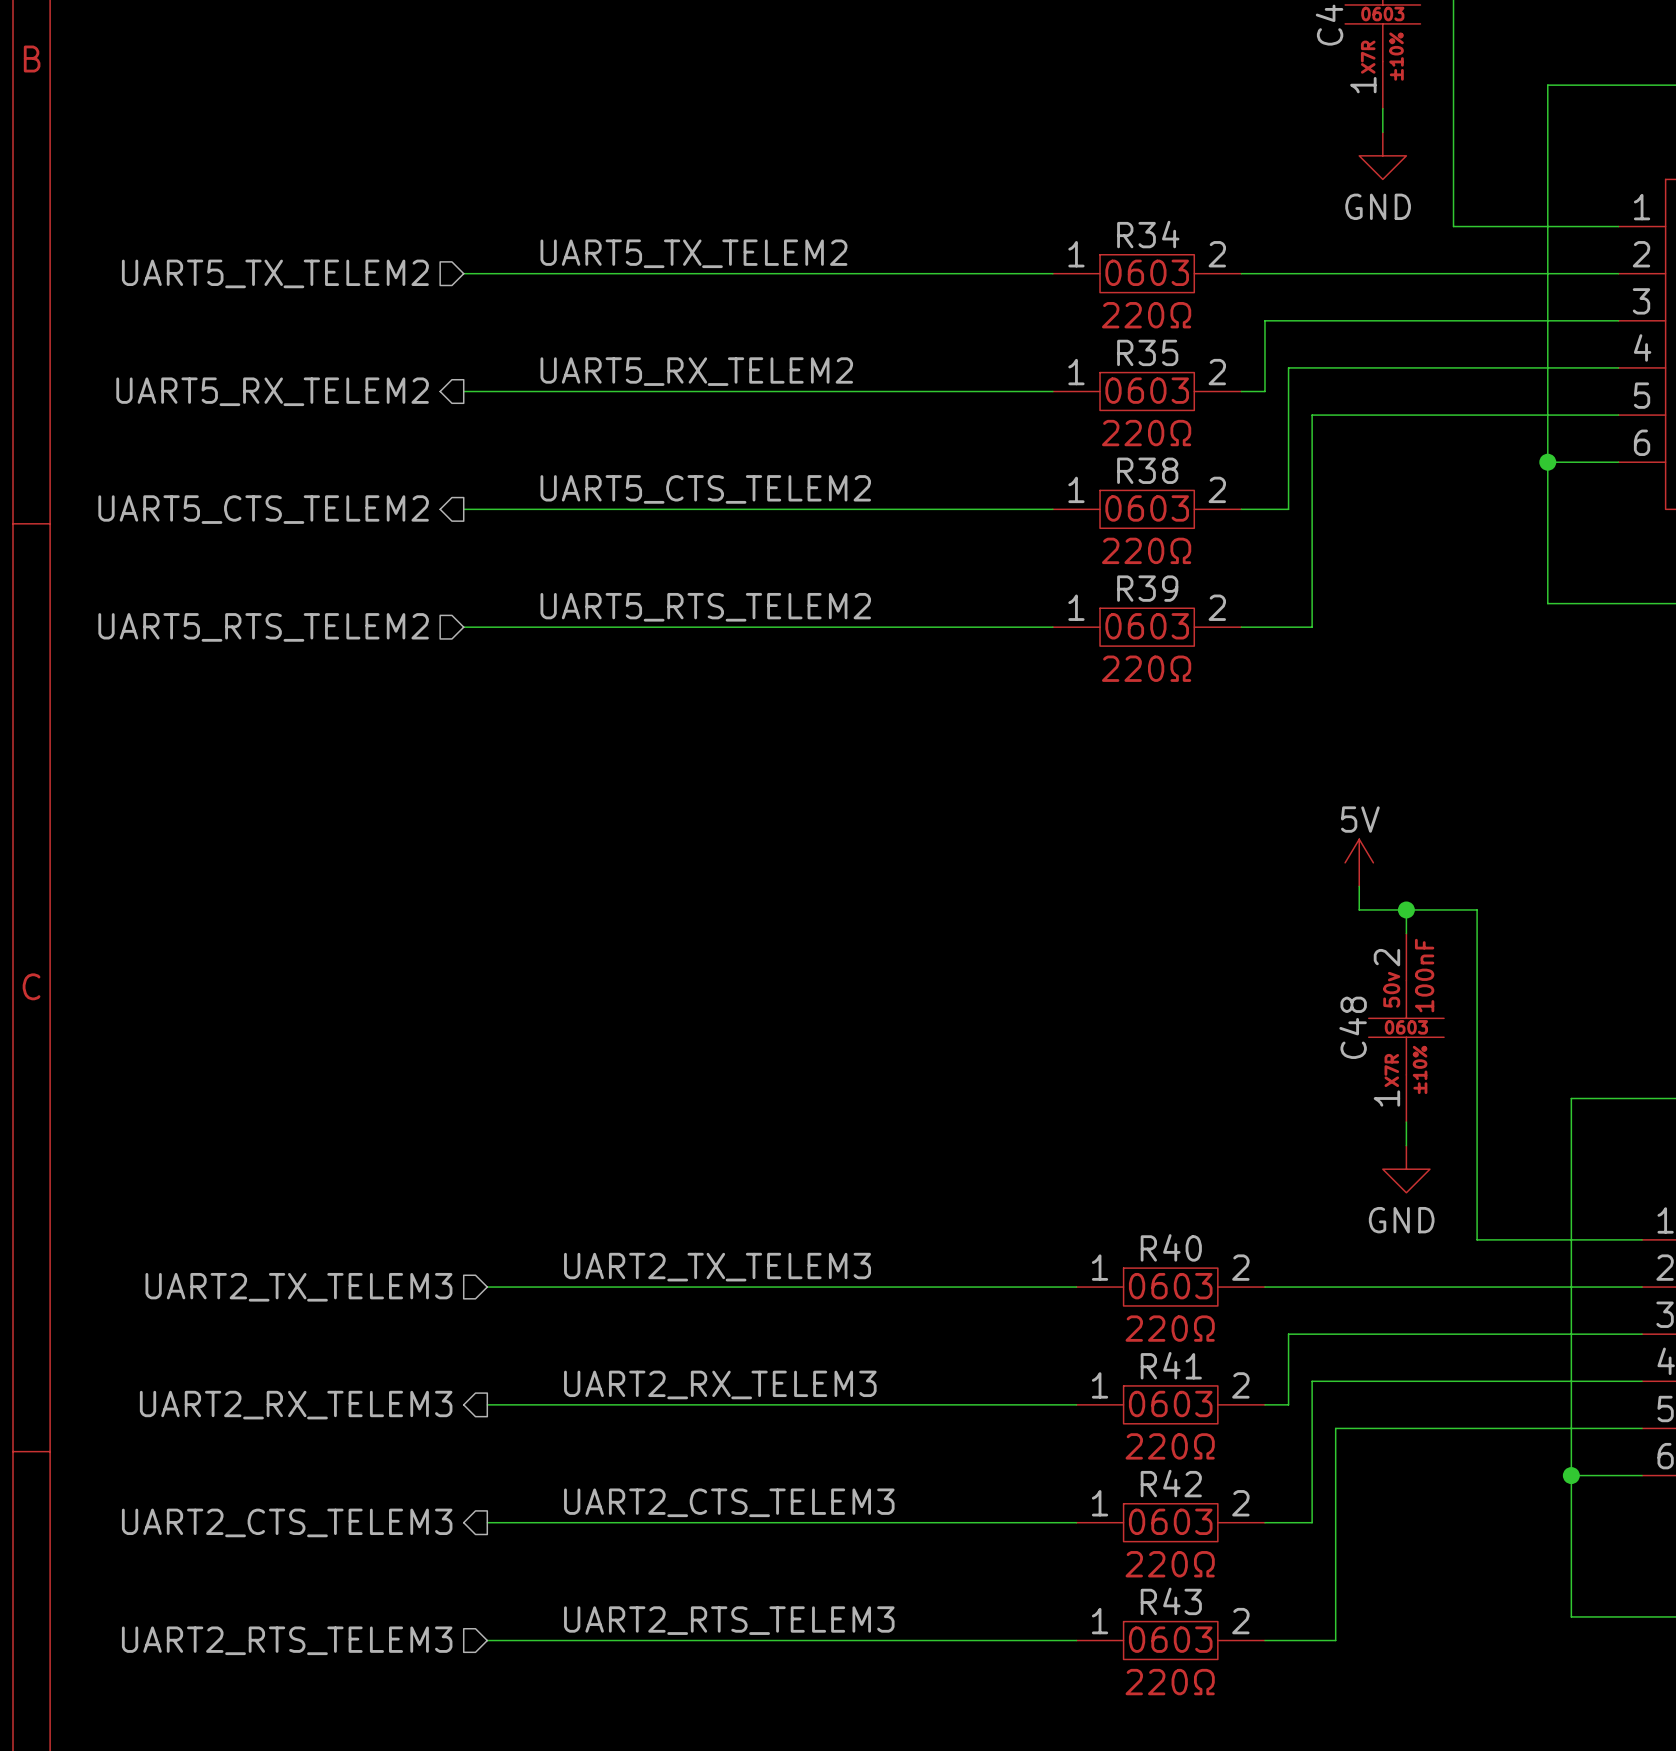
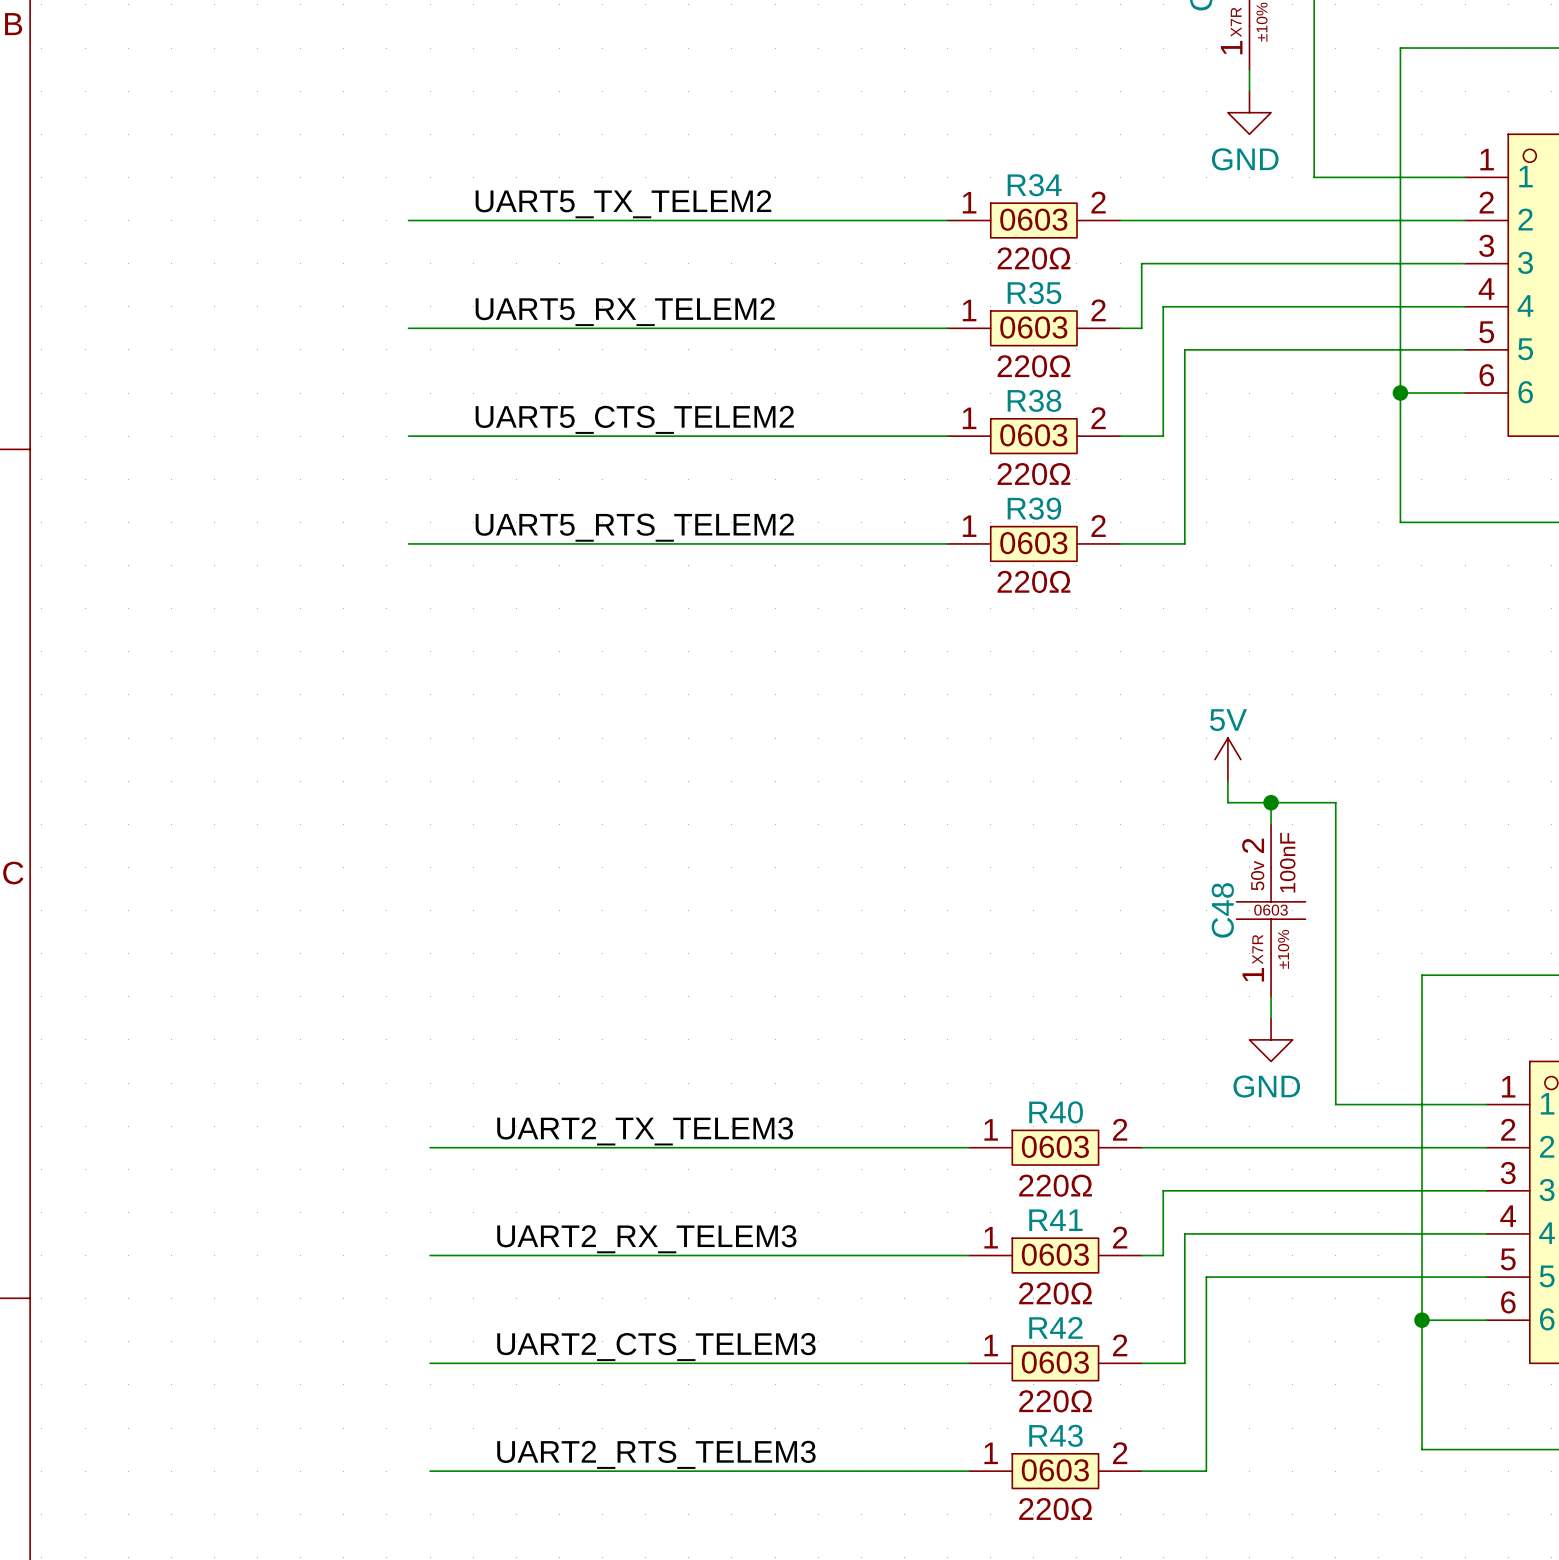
hierarchical label: UART5_TX_TELEM2 (275, 273) -> none
hierarchical label: UART5_RX_TELEM2 (272, 391) -> none
hierarchical label: UART5_CTS_TELEM2 (263, 509) -> none
hierarchical label: UART5_RTS_TELEM2 (263, 627) -> none
hierarchical label: UART2_TX_TELEM3 (298, 1287) -> none
hierarchical label: UART2_RX_TELEM3 (296, 1405) -> none
hierarchical label: UART2_CTS_TELEM3 (287, 1522) -> none
hierarchical label: UART2_RTS_TELEM3 (287, 1640) -> none

